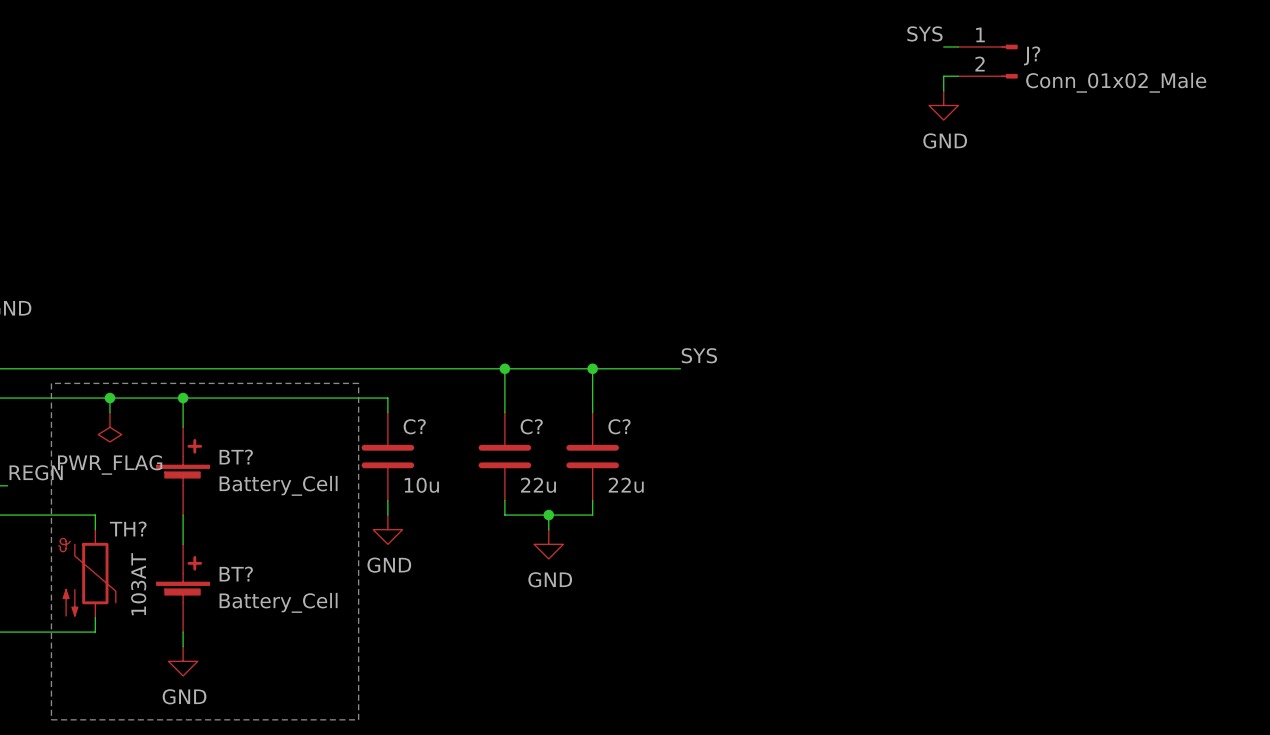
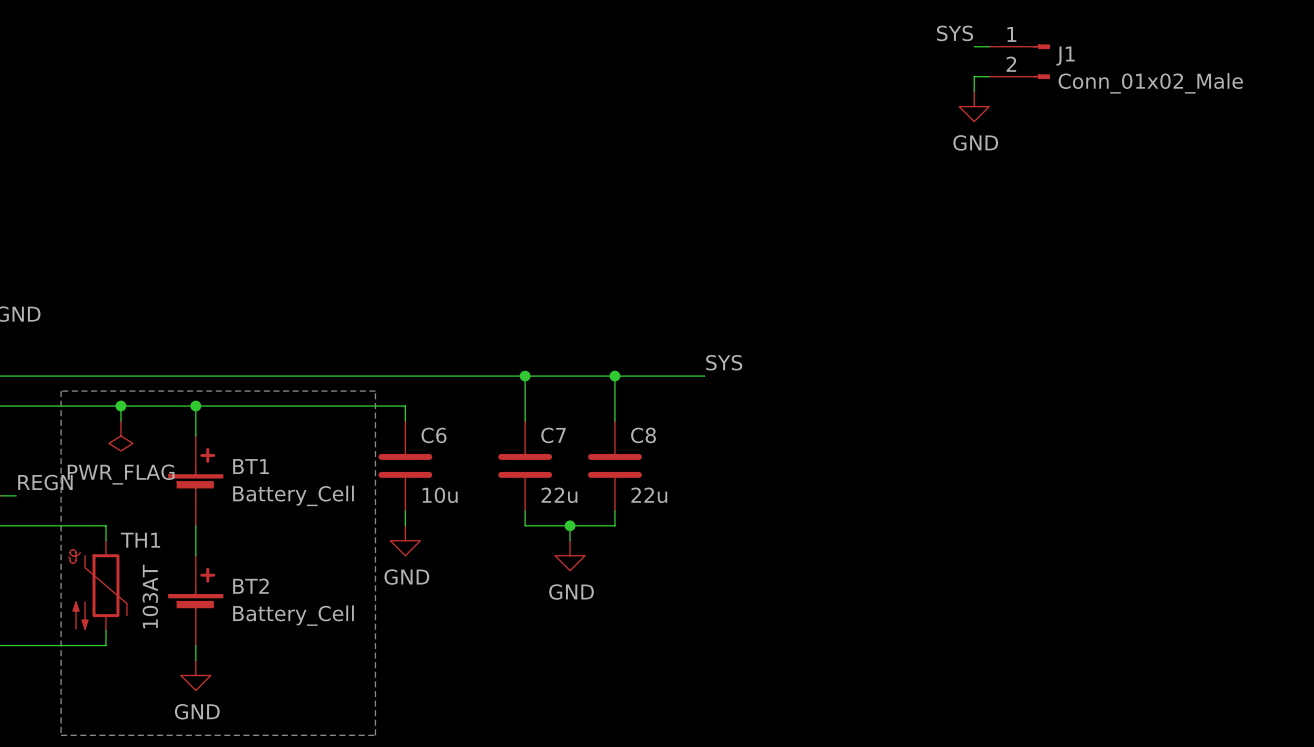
J? name: J? (1032, 55) -> J1 (1065, 56)
C? name: C? (414, 426) -> C6 (433, 435)
C? name: C? (531, 426) -> C7 (553, 435)
C? name: C? (619, 426) -> C8 (643, 435)
BT? name: BT? (236, 457) -> BT1 (251, 466)
TH? name: TH? (128, 529) -> TH1 (140, 540)
BT? name: BT? (236, 574) -> BT2 (250, 586)

